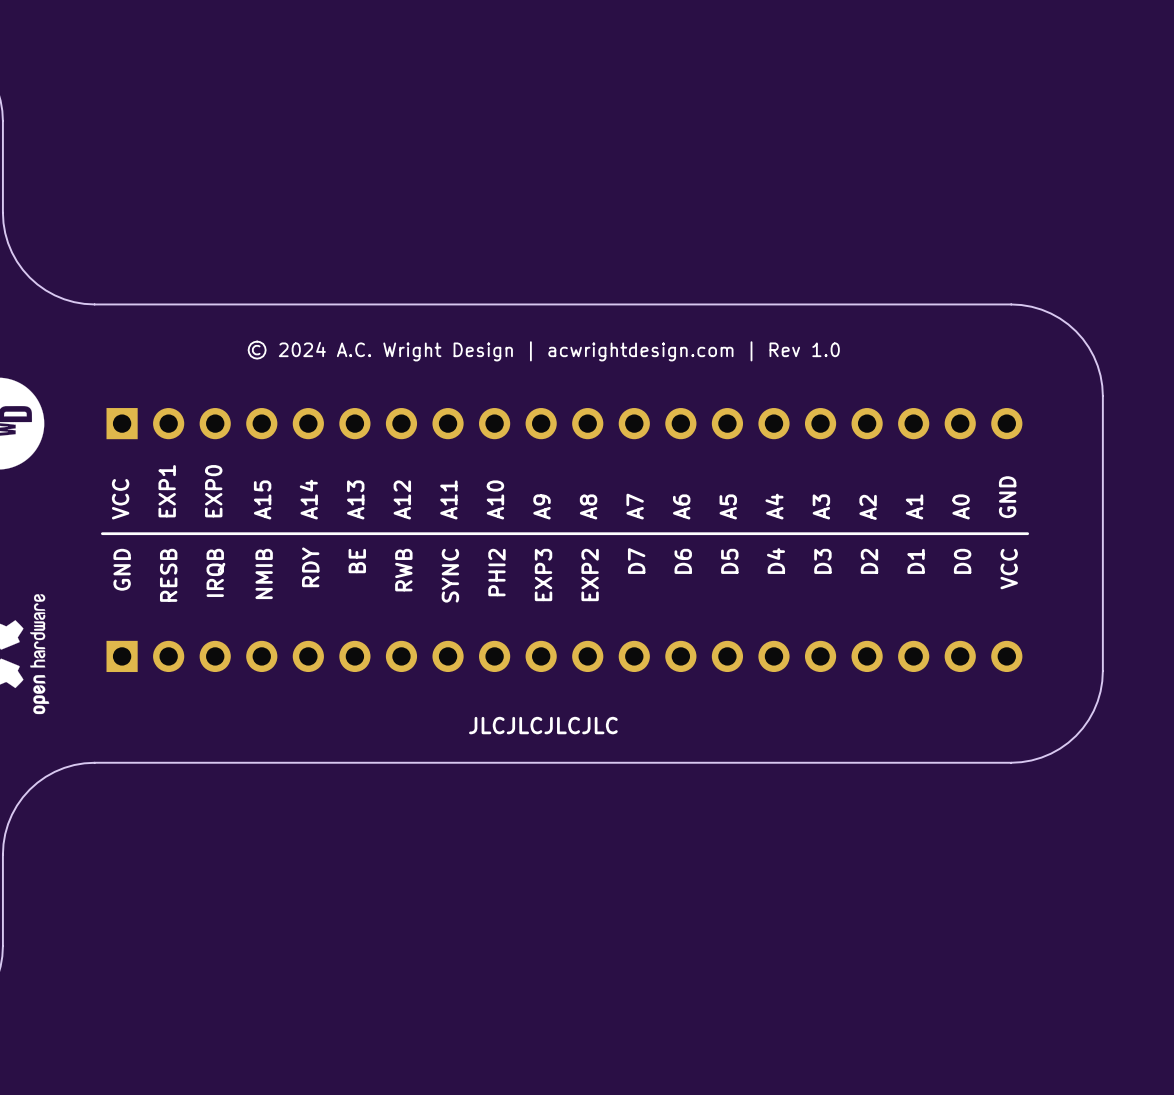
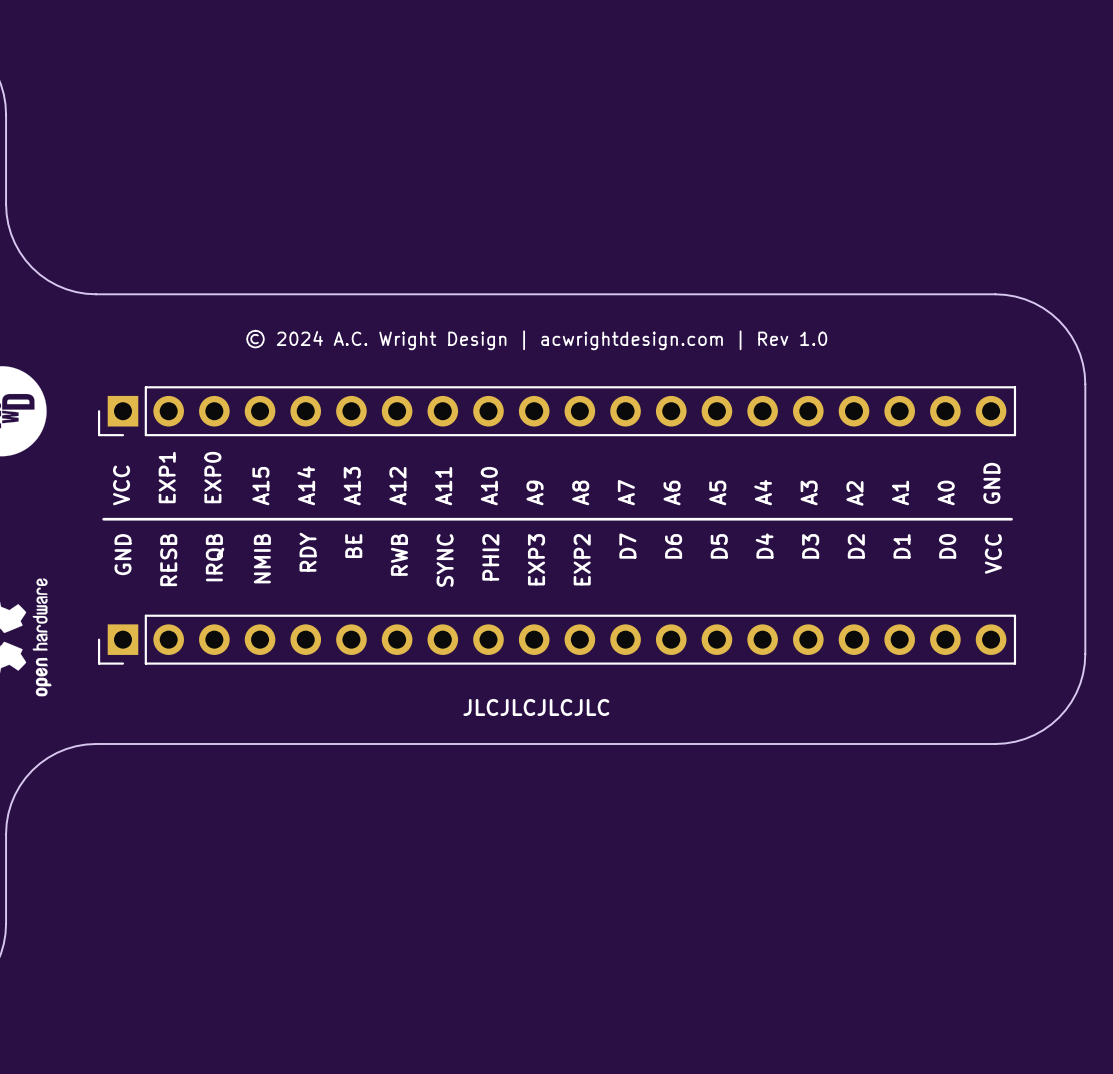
part side: bottom (564, 423) -> top (557, 411)
part side: bottom (564, 656) -> top (557, 639)

